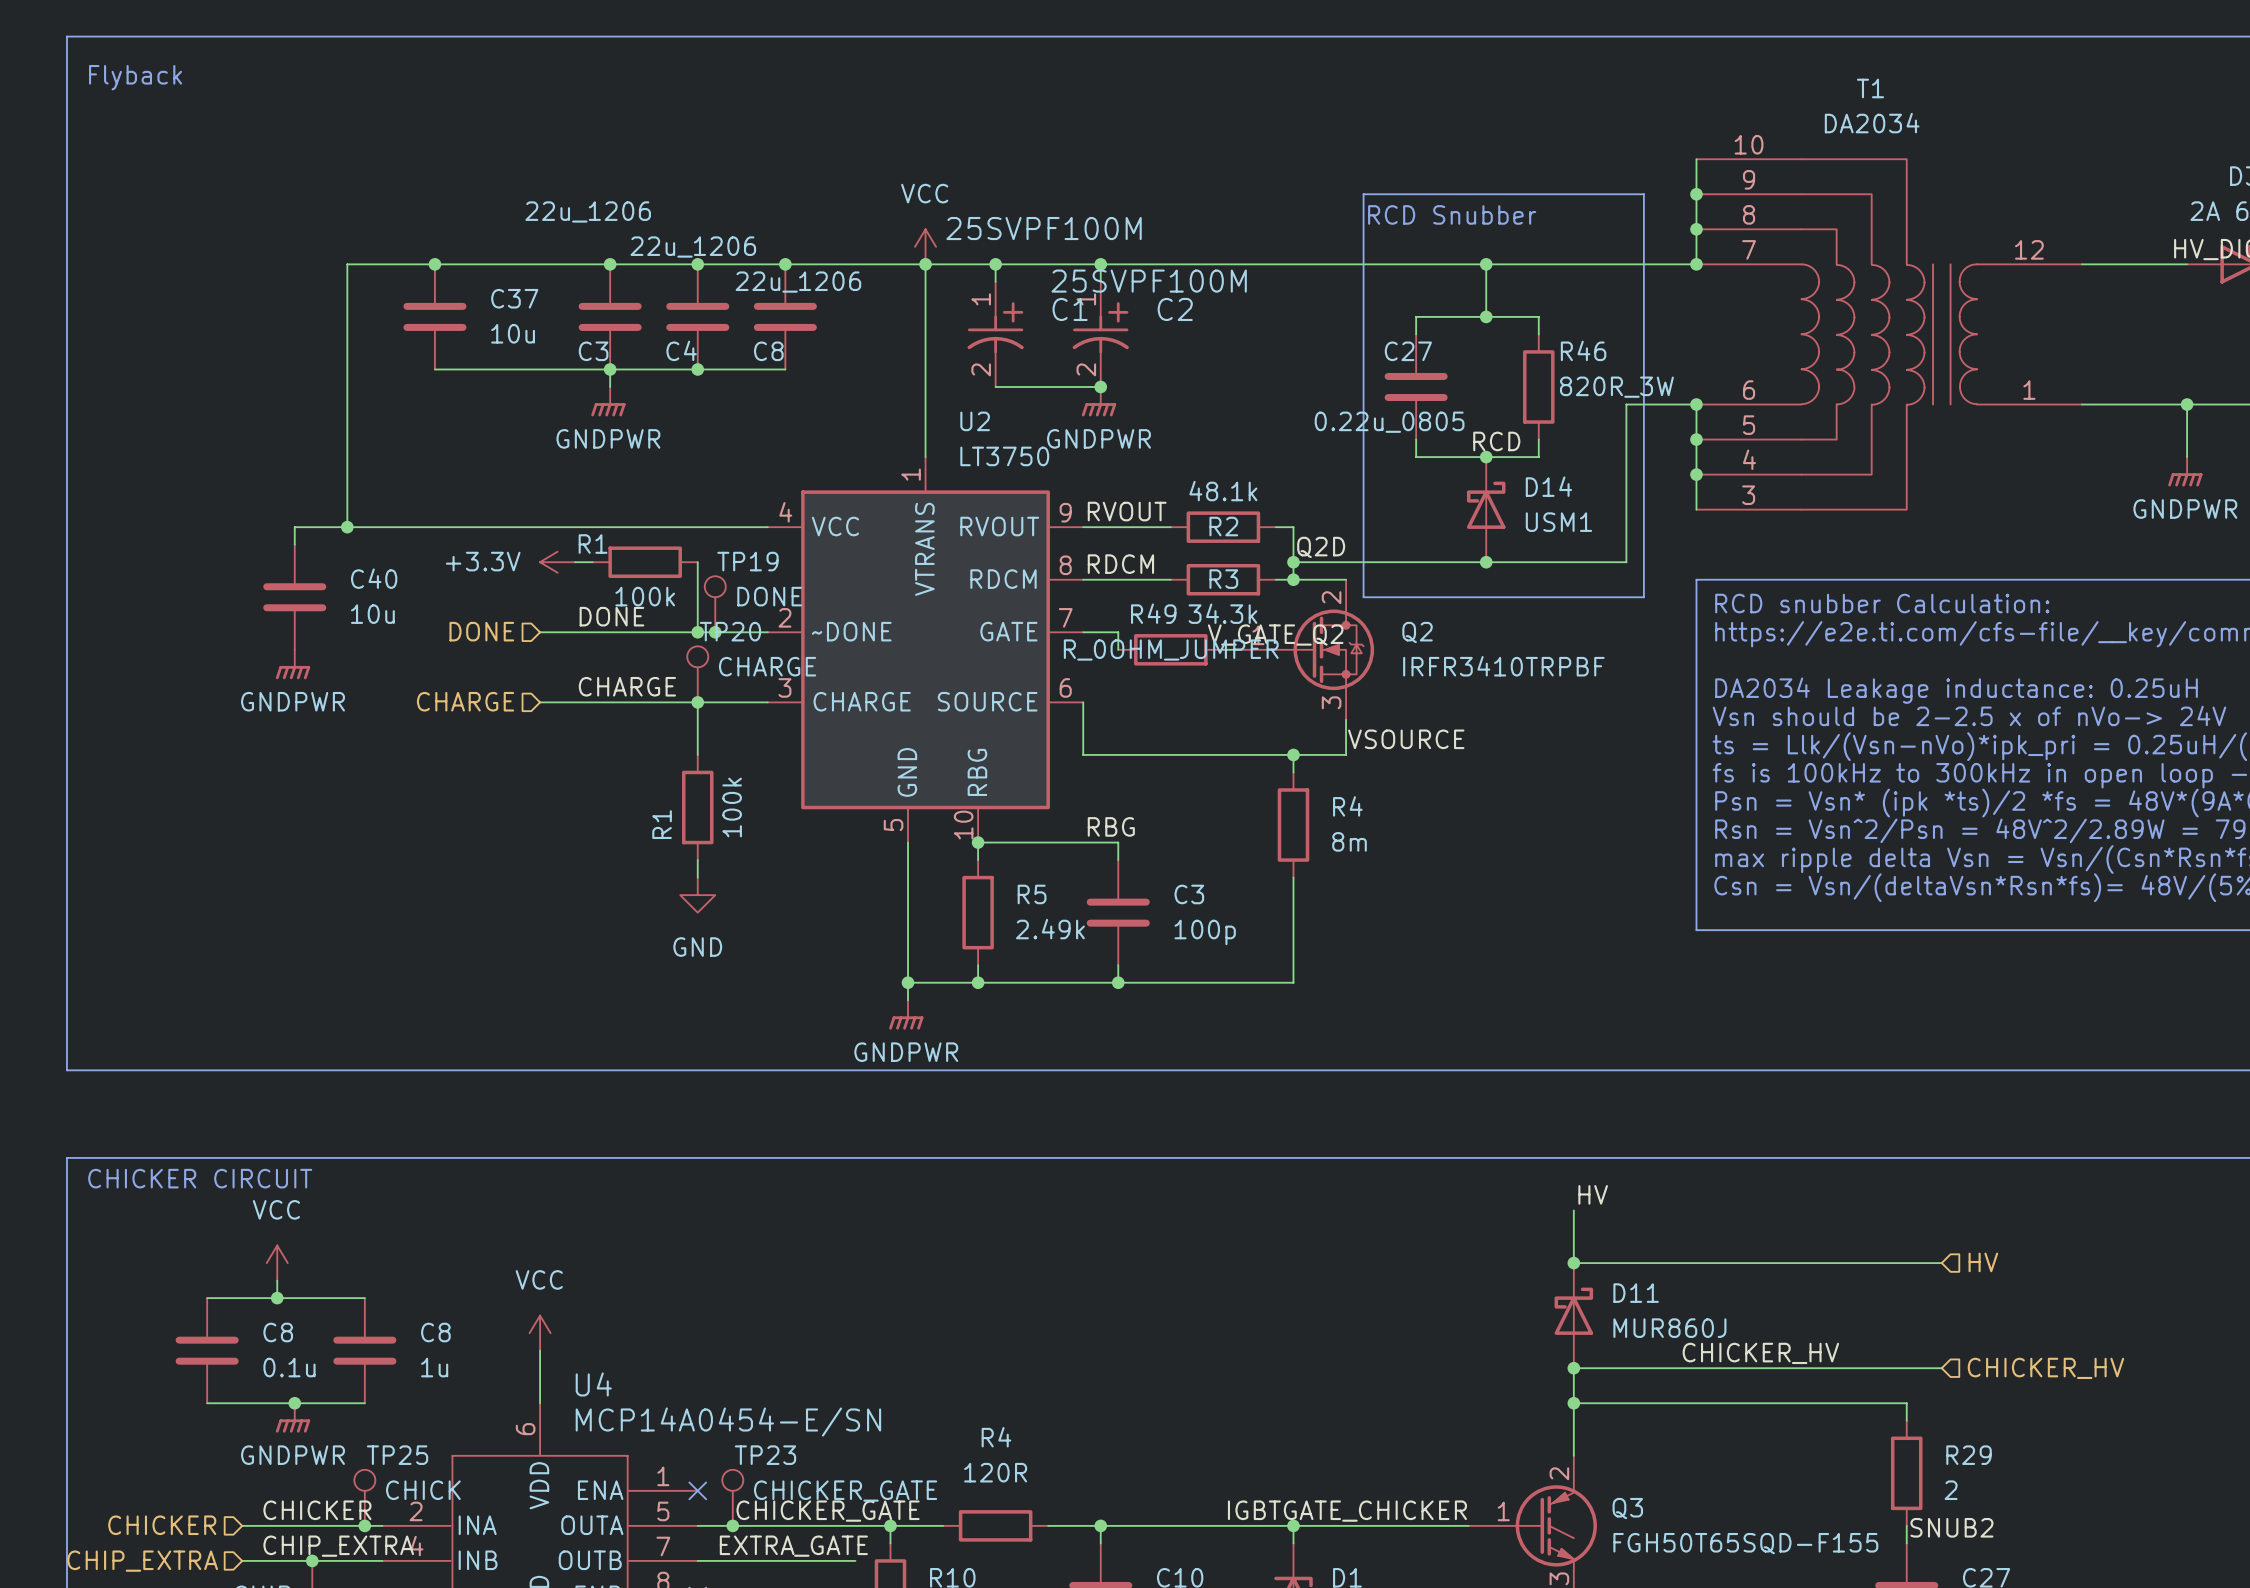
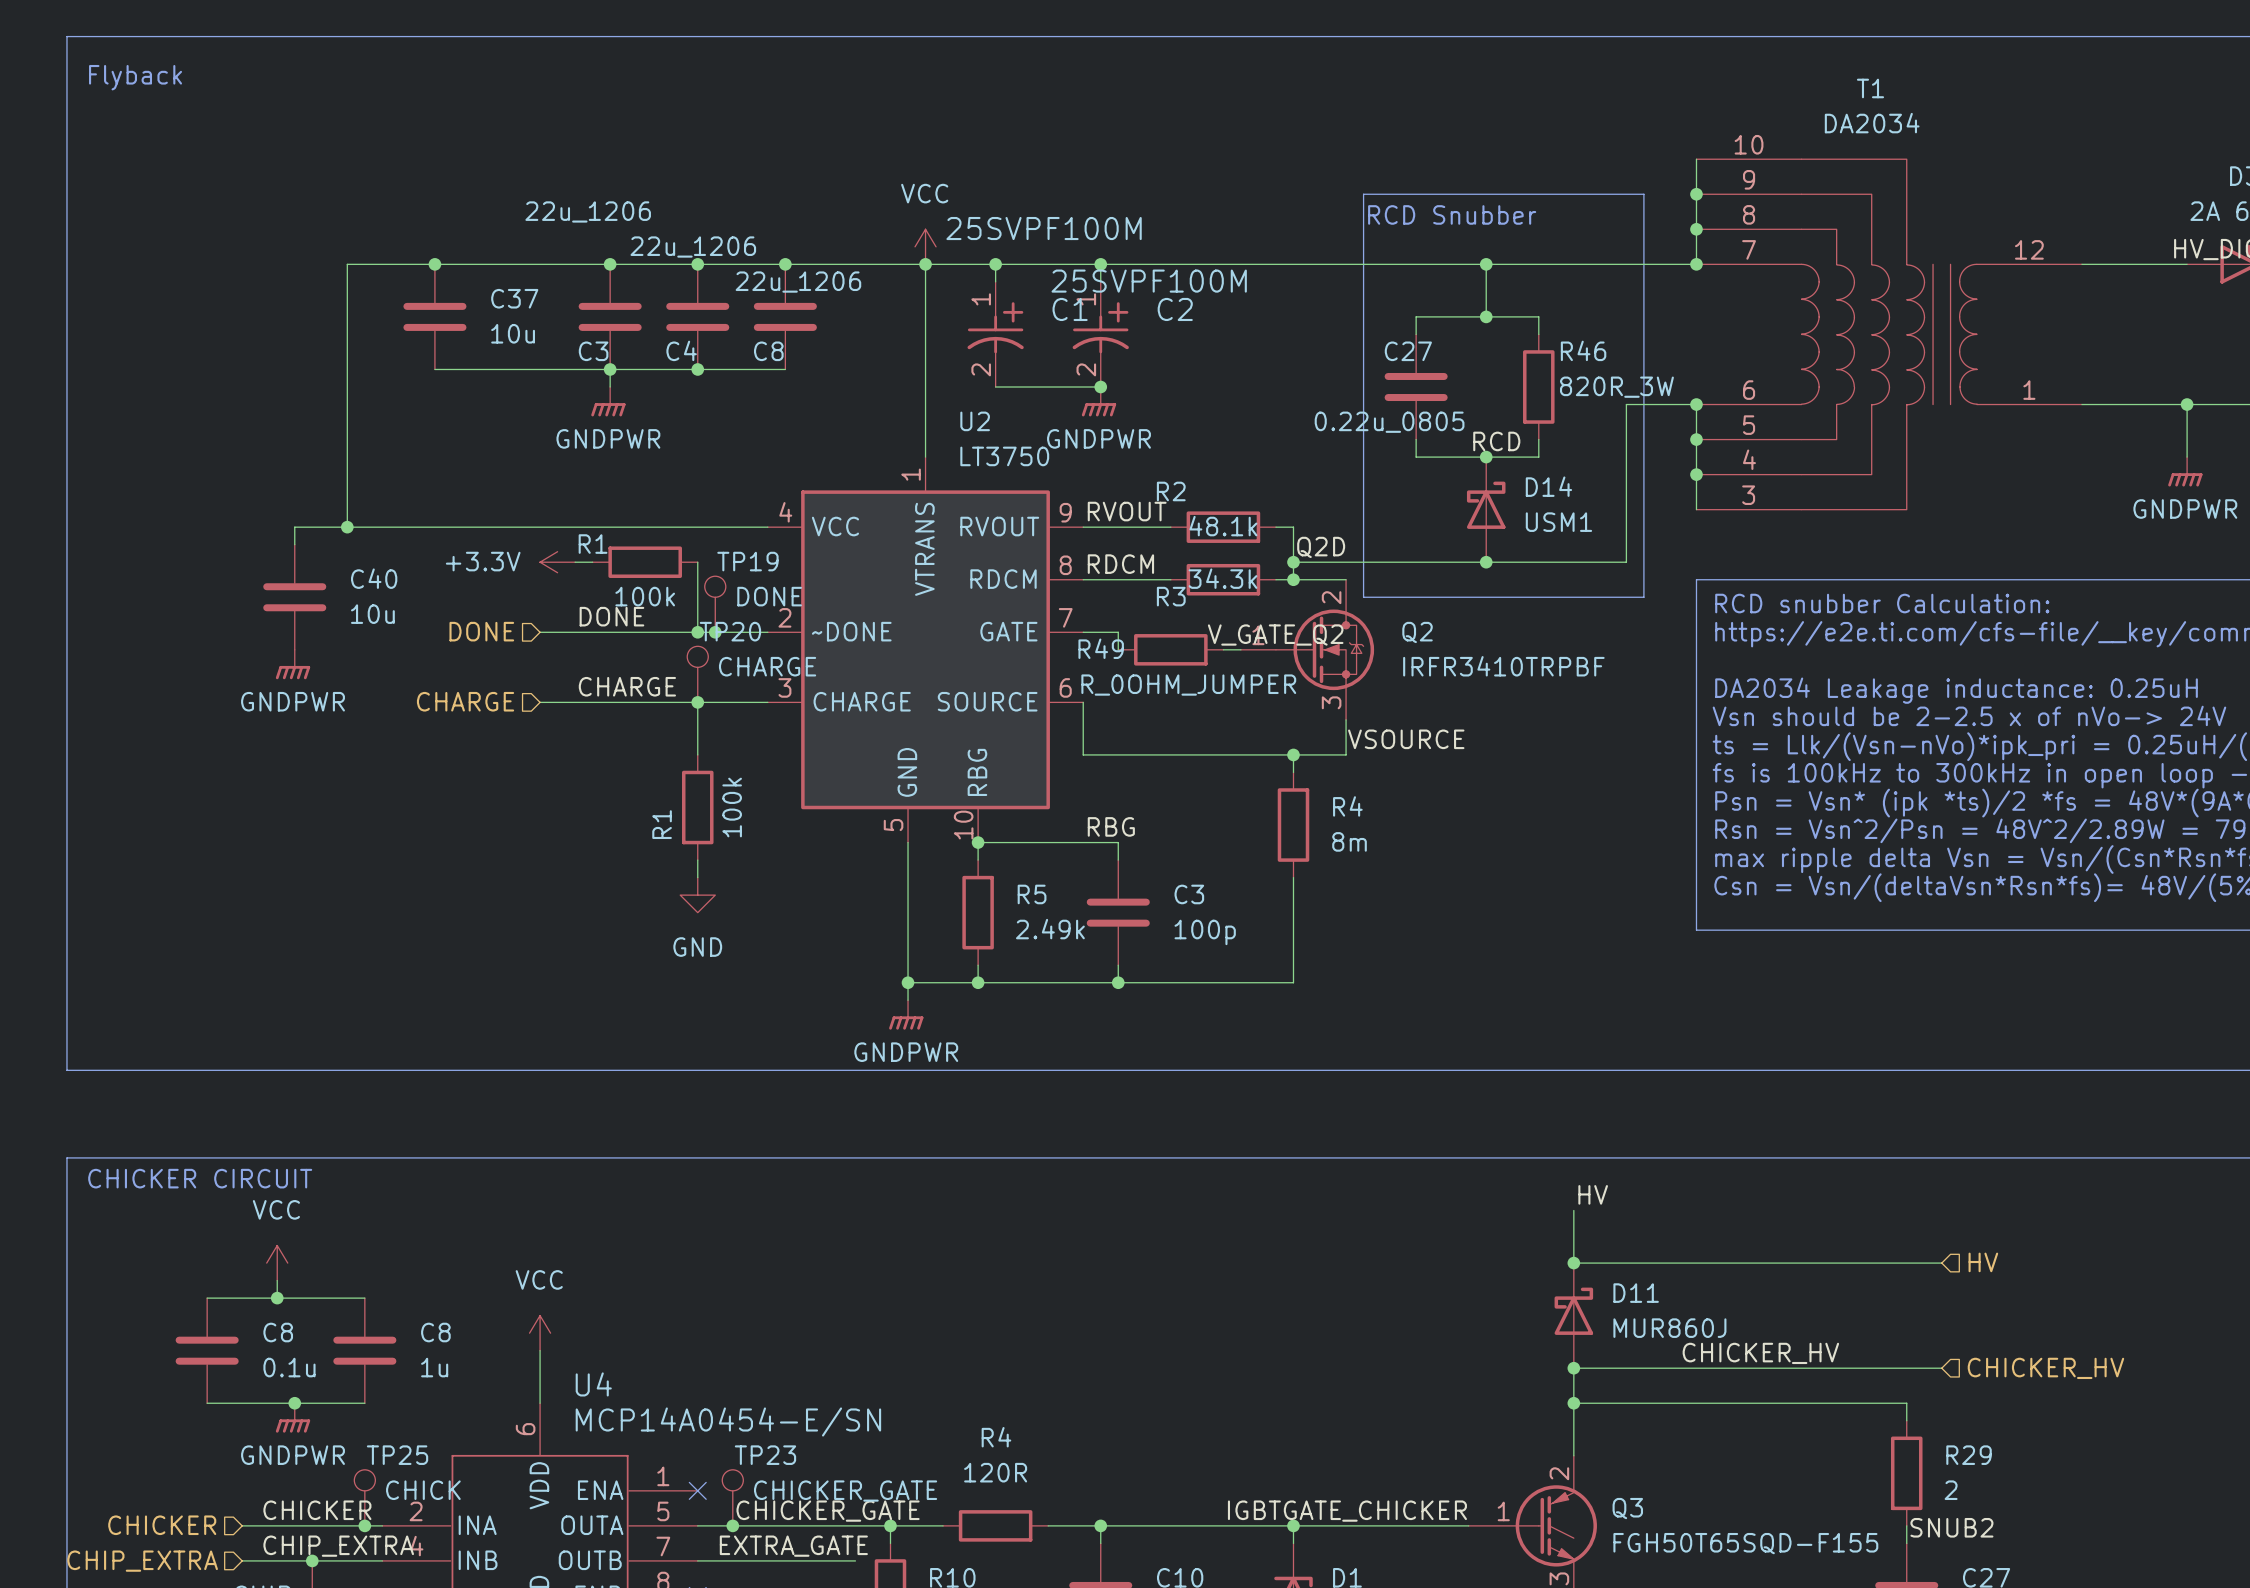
R2 value position: 48.1k (1223, 491) -> 48.1k (1223, 526)
R2 name position: R2 (1223, 526) -> R2 (1171, 491)
R3 name position: R3 (1223, 579) -> R3 (1171, 596)
R49 name position: R49 (1153, 613) -> R49 (1101, 648)
R3 value position: 34.3k (1222, 613) -> 34.3k (1222, 578)
R49 value position: R_0OHM_JUMPER (1171, 650) -> R_0OHM_JUMPER (1188, 685)

